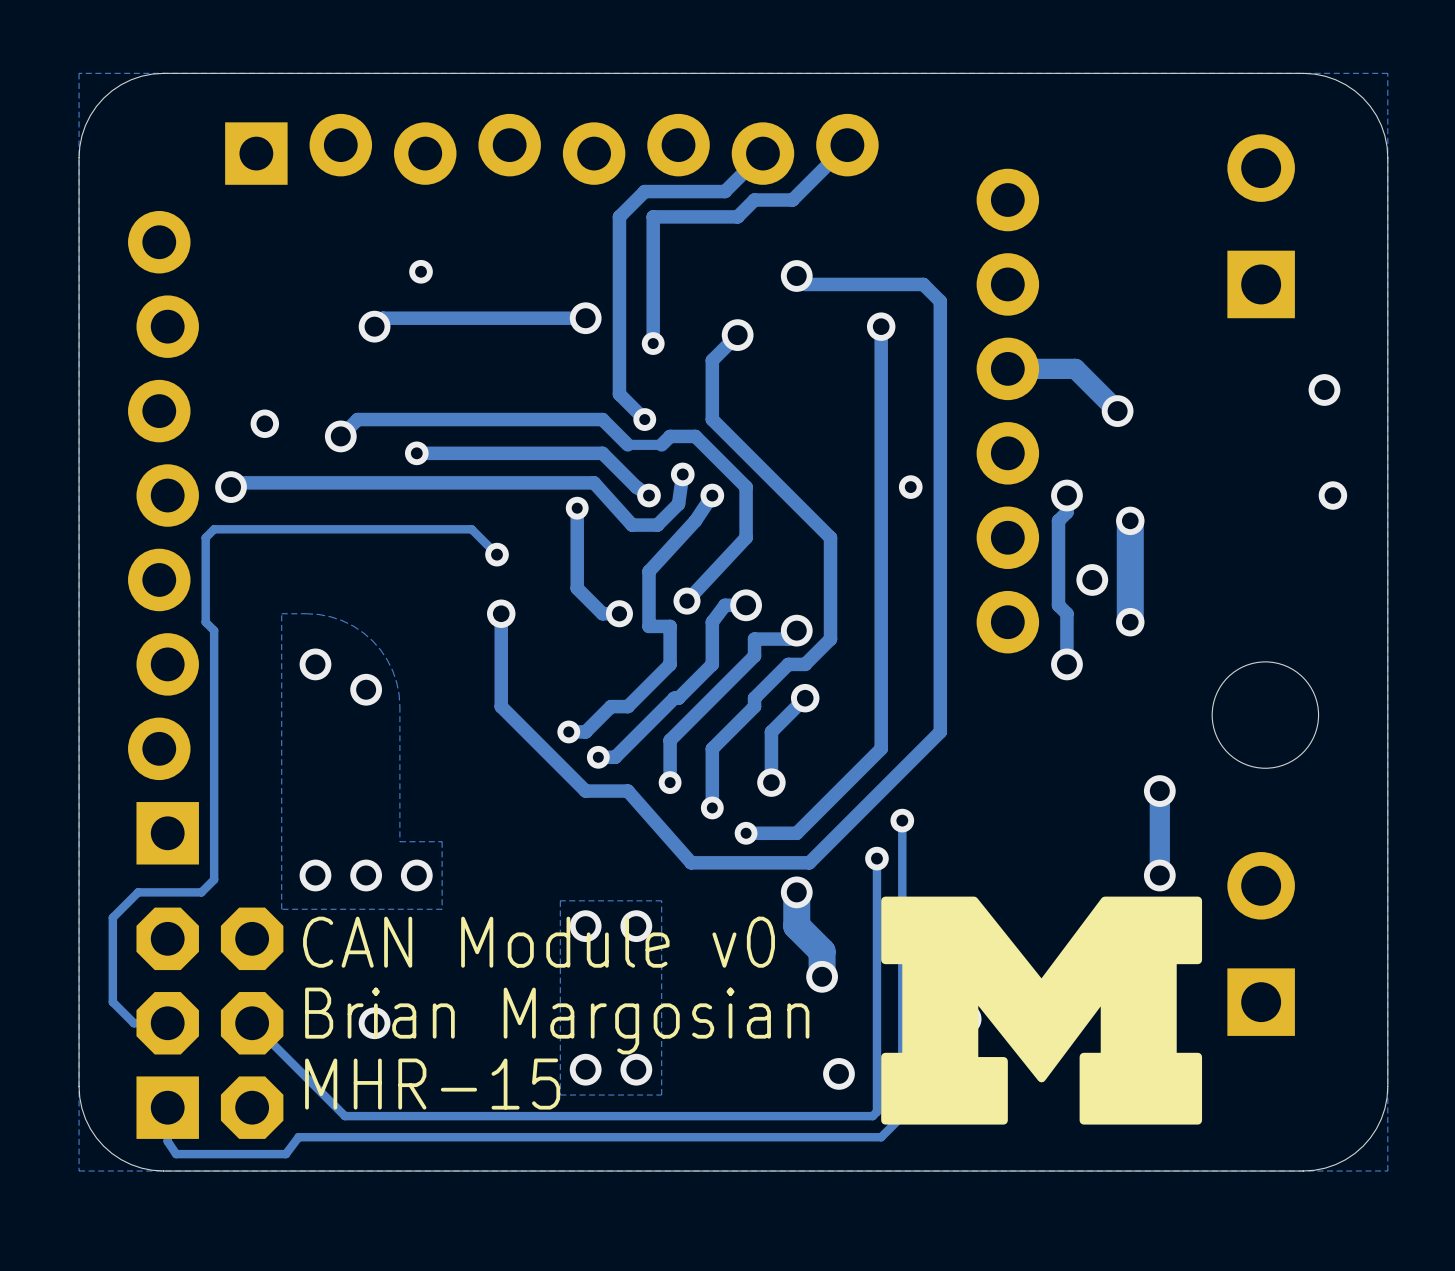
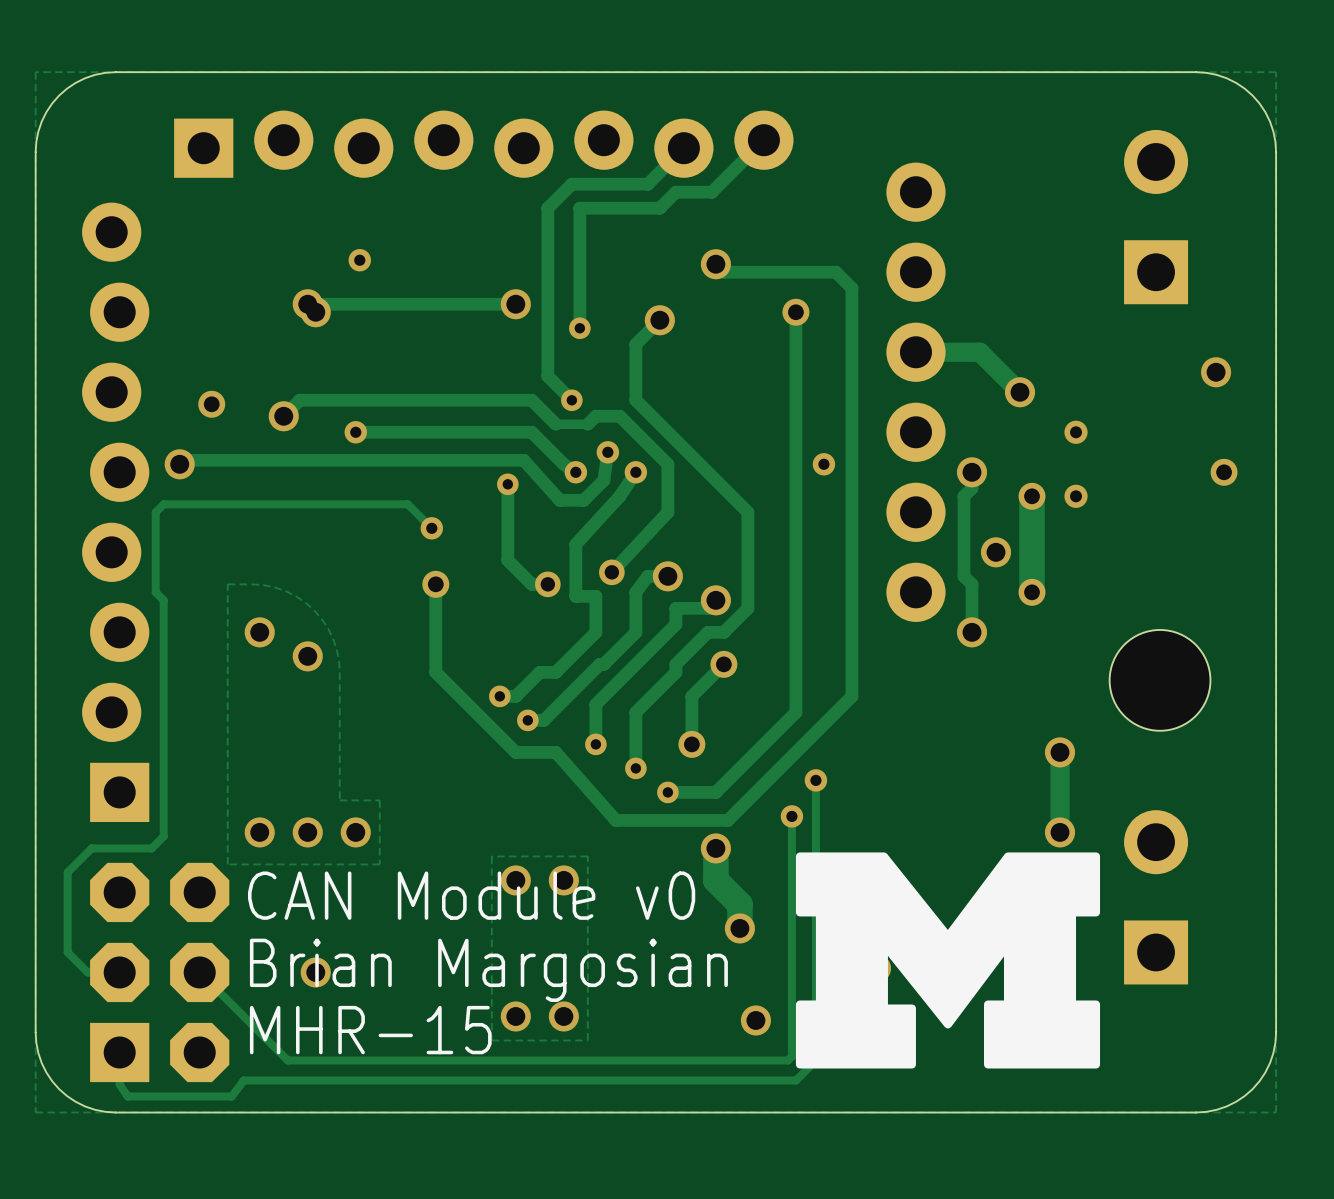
via: none -> (307, 304)
via: none -> (1076, 432)
via: none -> (1076, 496)

